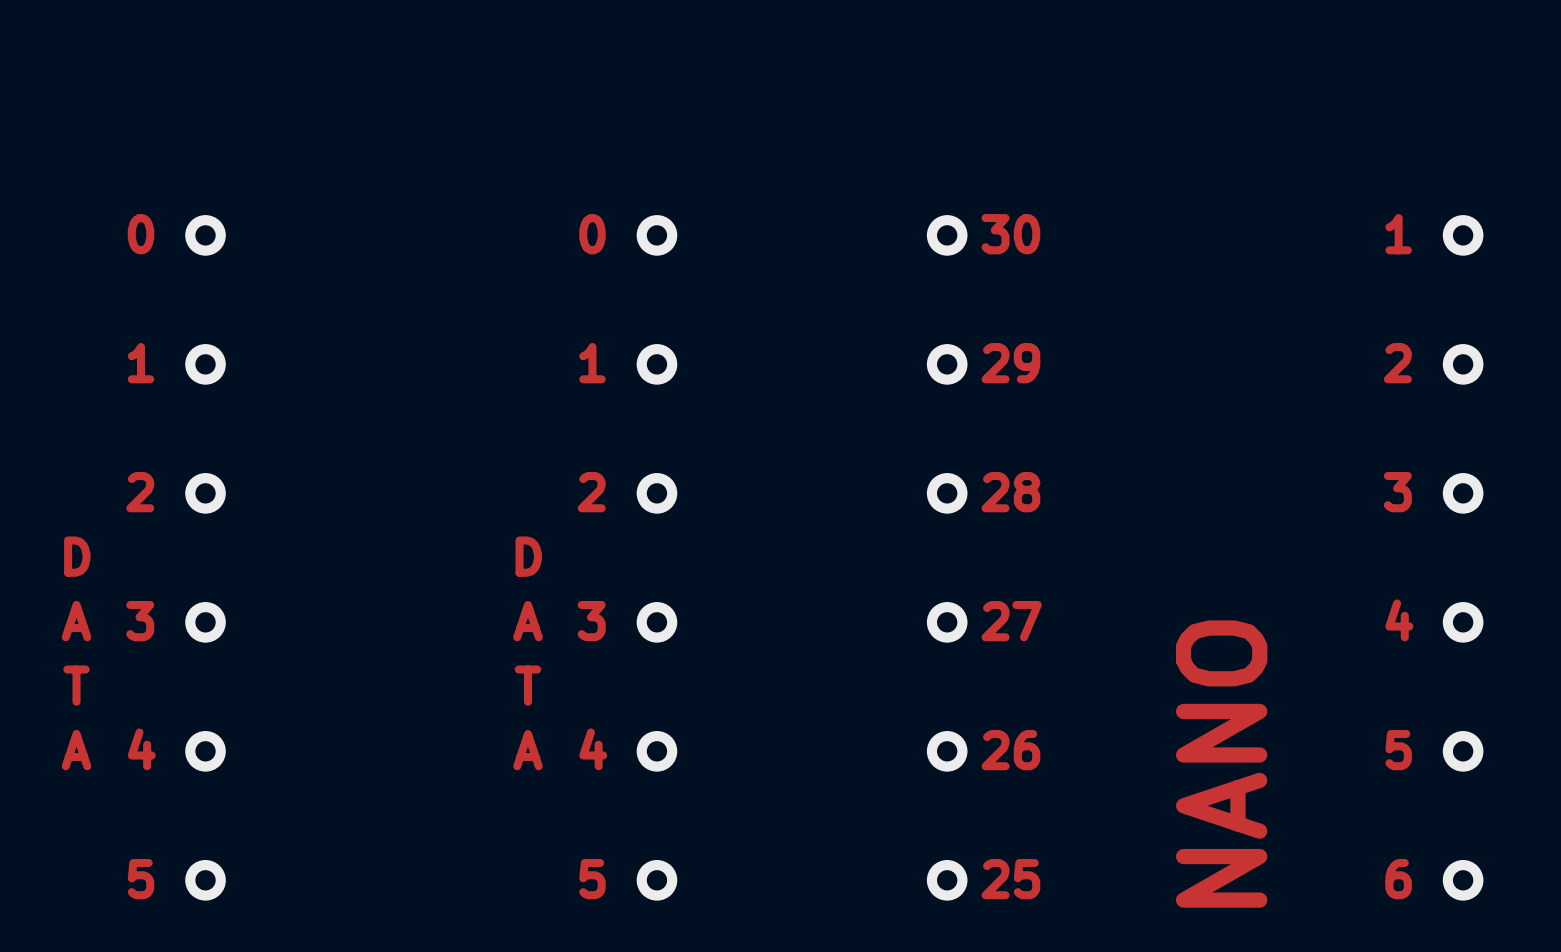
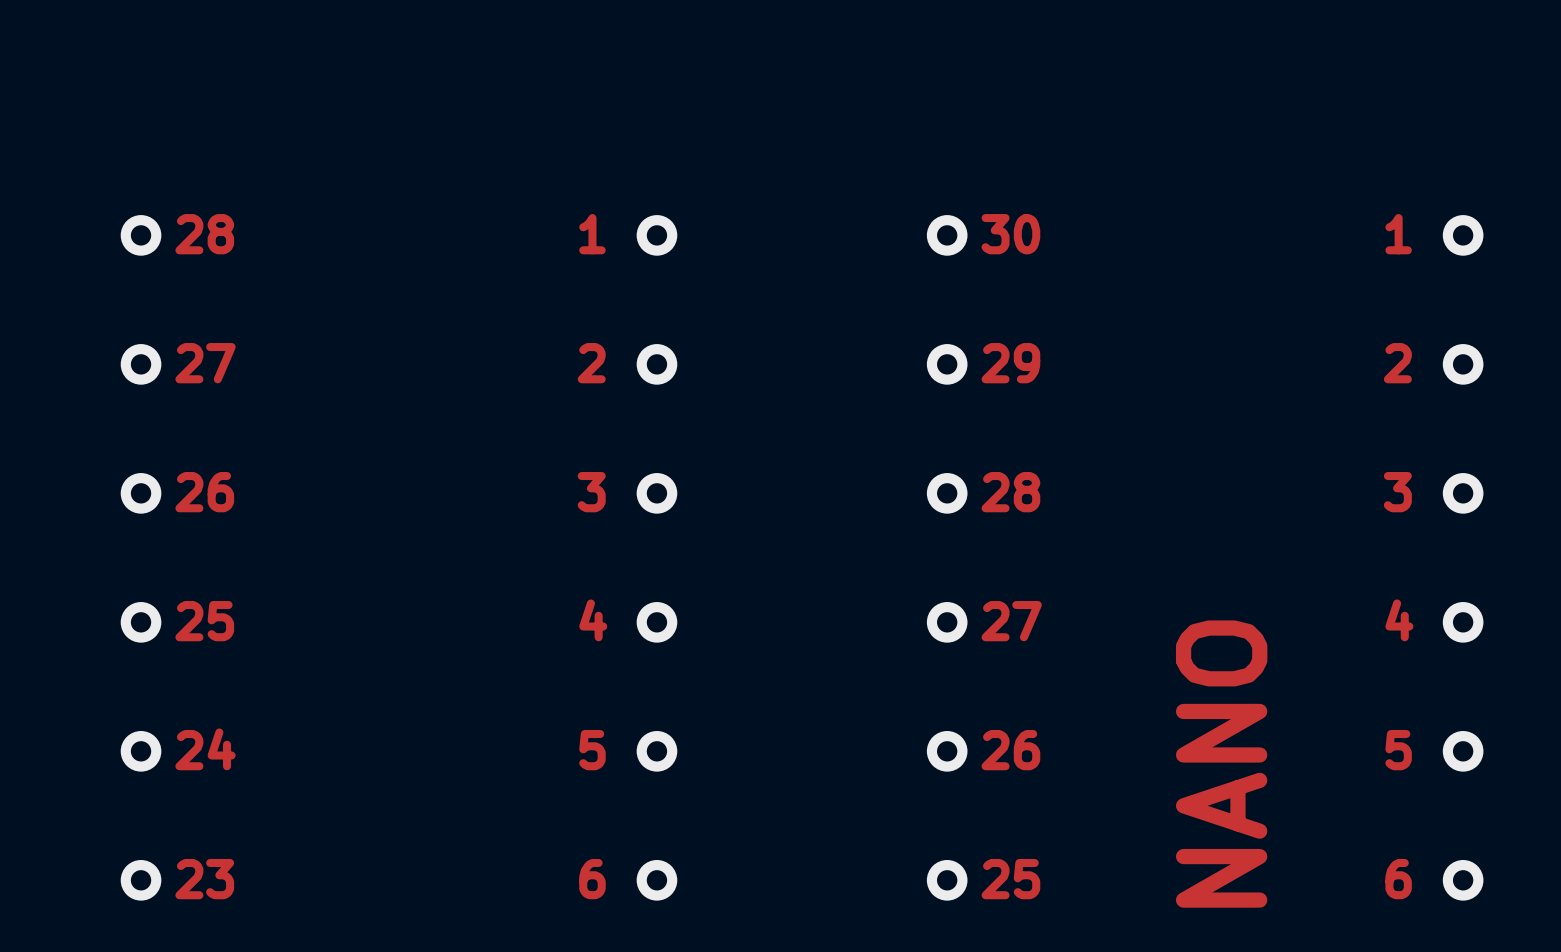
text: 0 (141, 234) -> none
text: none -> 28 (204, 234)
text: 0 (592, 234) -> 1 (592, 234)
via position: (205, 235) -> (141, 235)
text: 1 (141, 363) -> none
text: none -> 27 (205, 363)
text: 1 (592, 363) -> 2 (591, 363)
via position: (205, 364) -> (141, 364)
text: 2 (140, 492) -> none
text: none -> 26 (204, 492)
text: 2 (591, 492) -> 3 (591, 492)
via position: (205, 493) -> (141, 493)
text: D (77, 556) -> none
text: D (528, 556) -> none
text: A (76, 621) -> none
text: 3 (140, 621) -> none
text: none -> 25 (204, 621)
text: A (527, 621) -> none
text: 3 (591, 621) -> 4 (593, 620)
via position: (205, 622) -> (141, 622)
text: T (76, 685) -> none
text: T (527, 685) -> none
text: 4 (141, 749) -> none
text: none -> 24 (205, 749)
text: 4 (593, 749) -> 5 (592, 750)
text: A (76, 750) -> none
text: A (527, 750) -> none
via position: (205, 751) -> (141, 751)
text: 5 (141, 879) -> none
text: none -> 23 (204, 879)
text: 5 (592, 879) -> 6 (592, 879)
via position: (205, 880) -> (141, 880)

